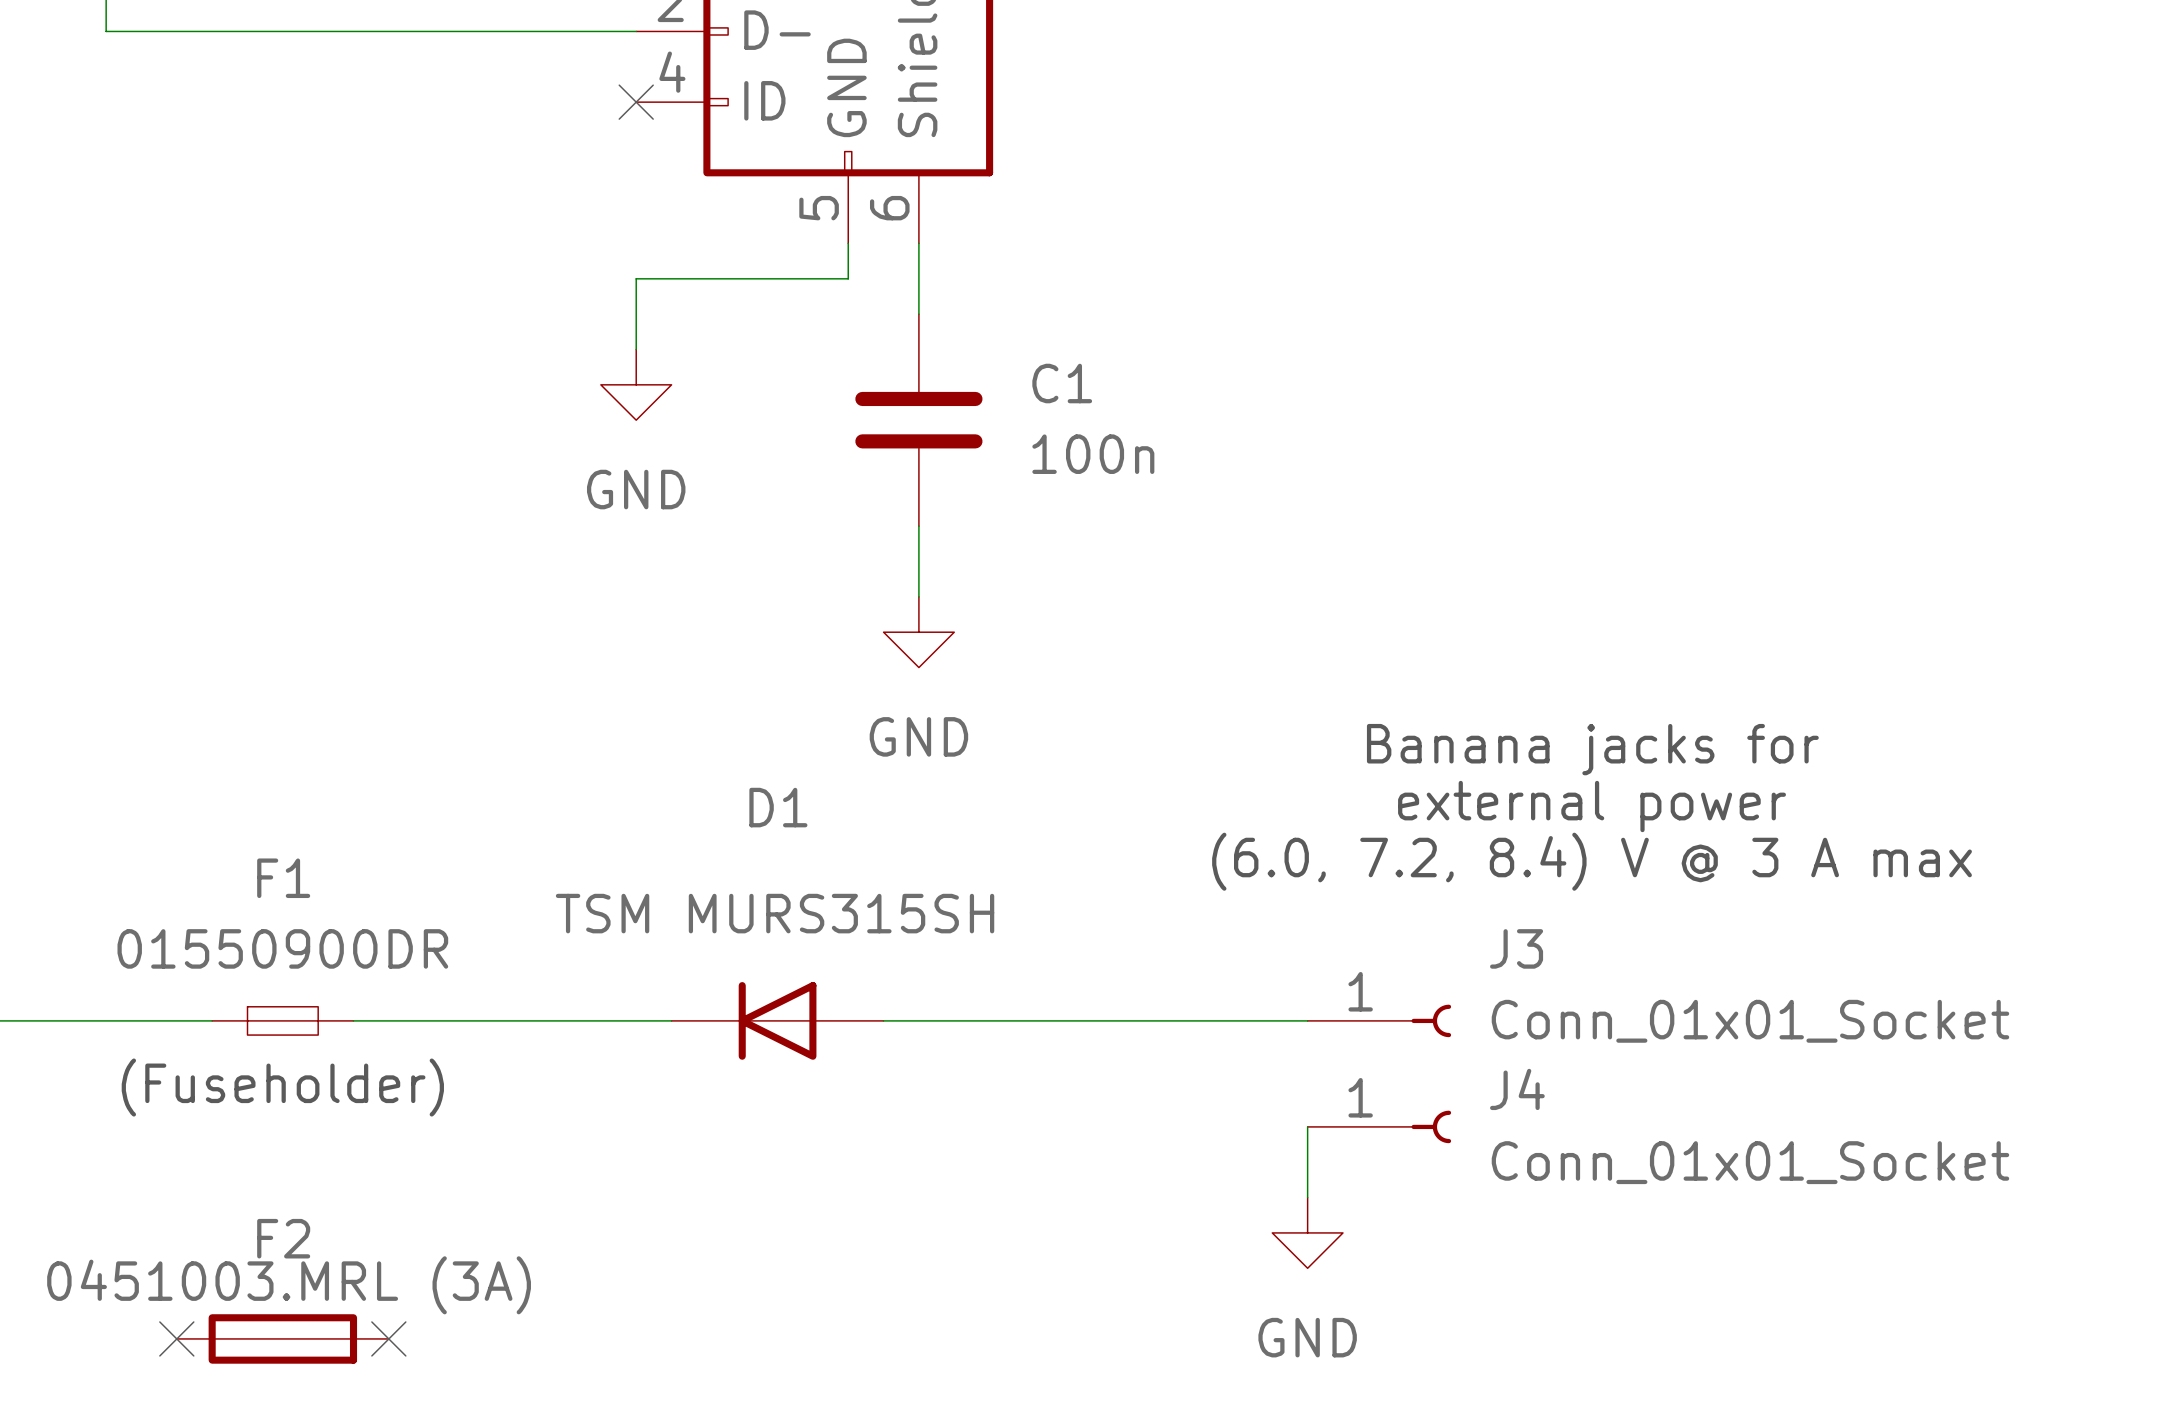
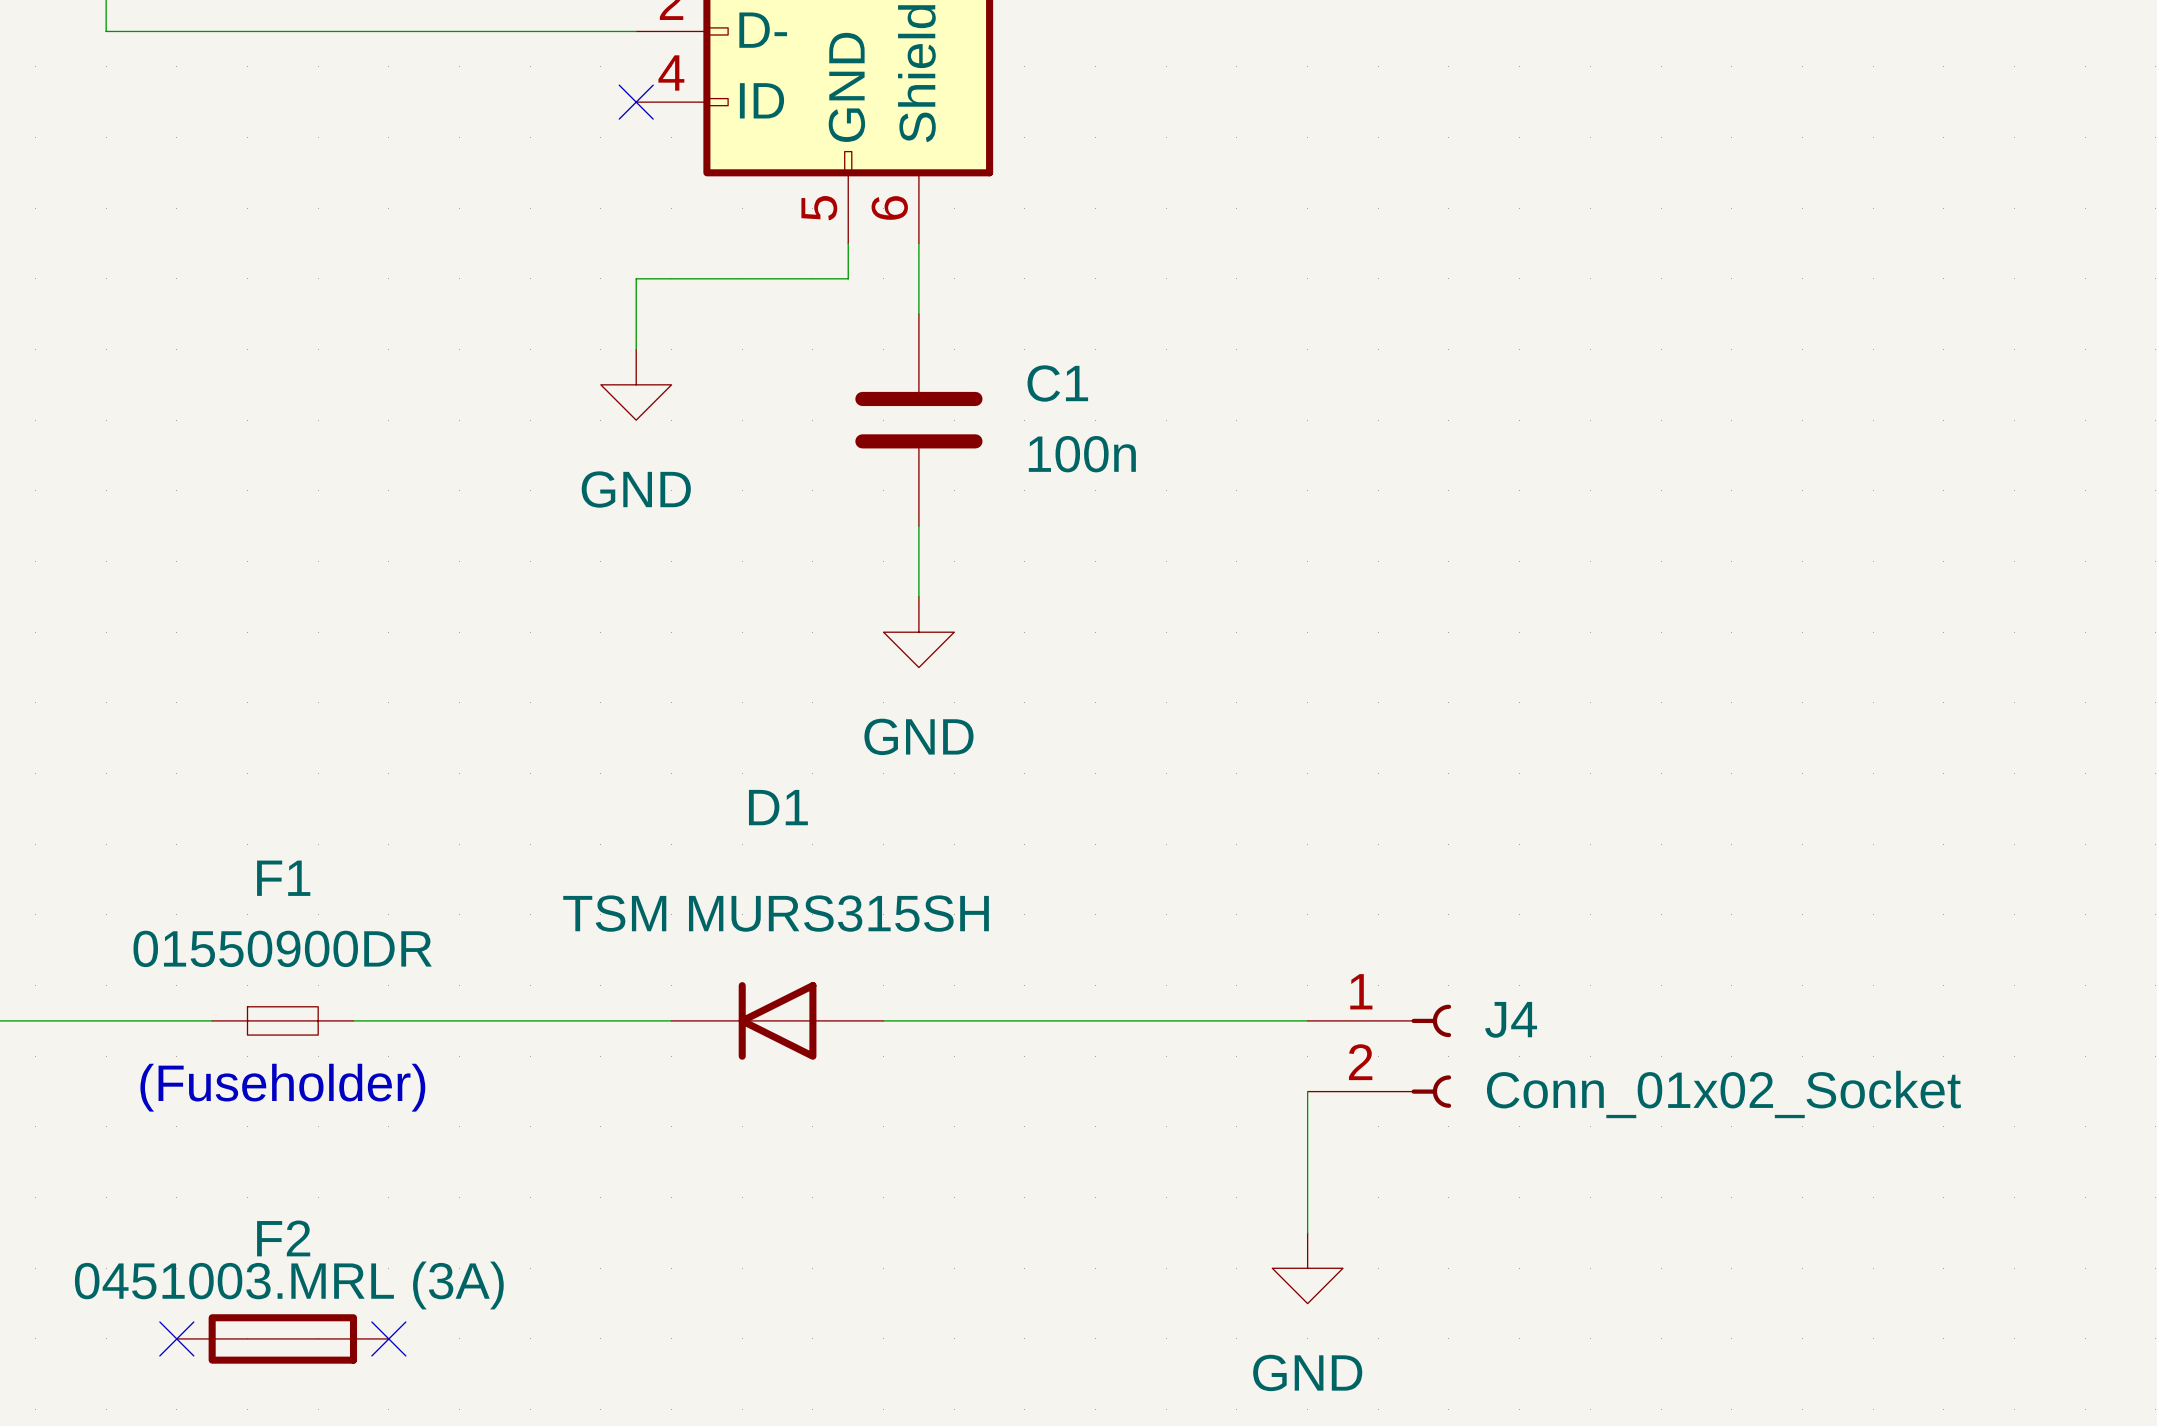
text: Banana jacks for (1592, 749) -> none
text: external power (1592, 806) -> none
text: (6.0, 7.2, 8.4) V @ 3 A max (1592, 861) -> none
J3: Conn_01x01_Socket (1379, 1020) -> none
wire: none -> (1307, 1091) (1307, 1126)
J4 symbol: [1307, 1110, 1452, 1144] -> [1307, 1004, 1452, 1108]
J4 value: Conn_01x01_Socket (1750, 1162) -> Conn_01x02_Socket (1723, 1094)
power symbol position: GND (1307, 1232) -> GND (1307, 1268)

